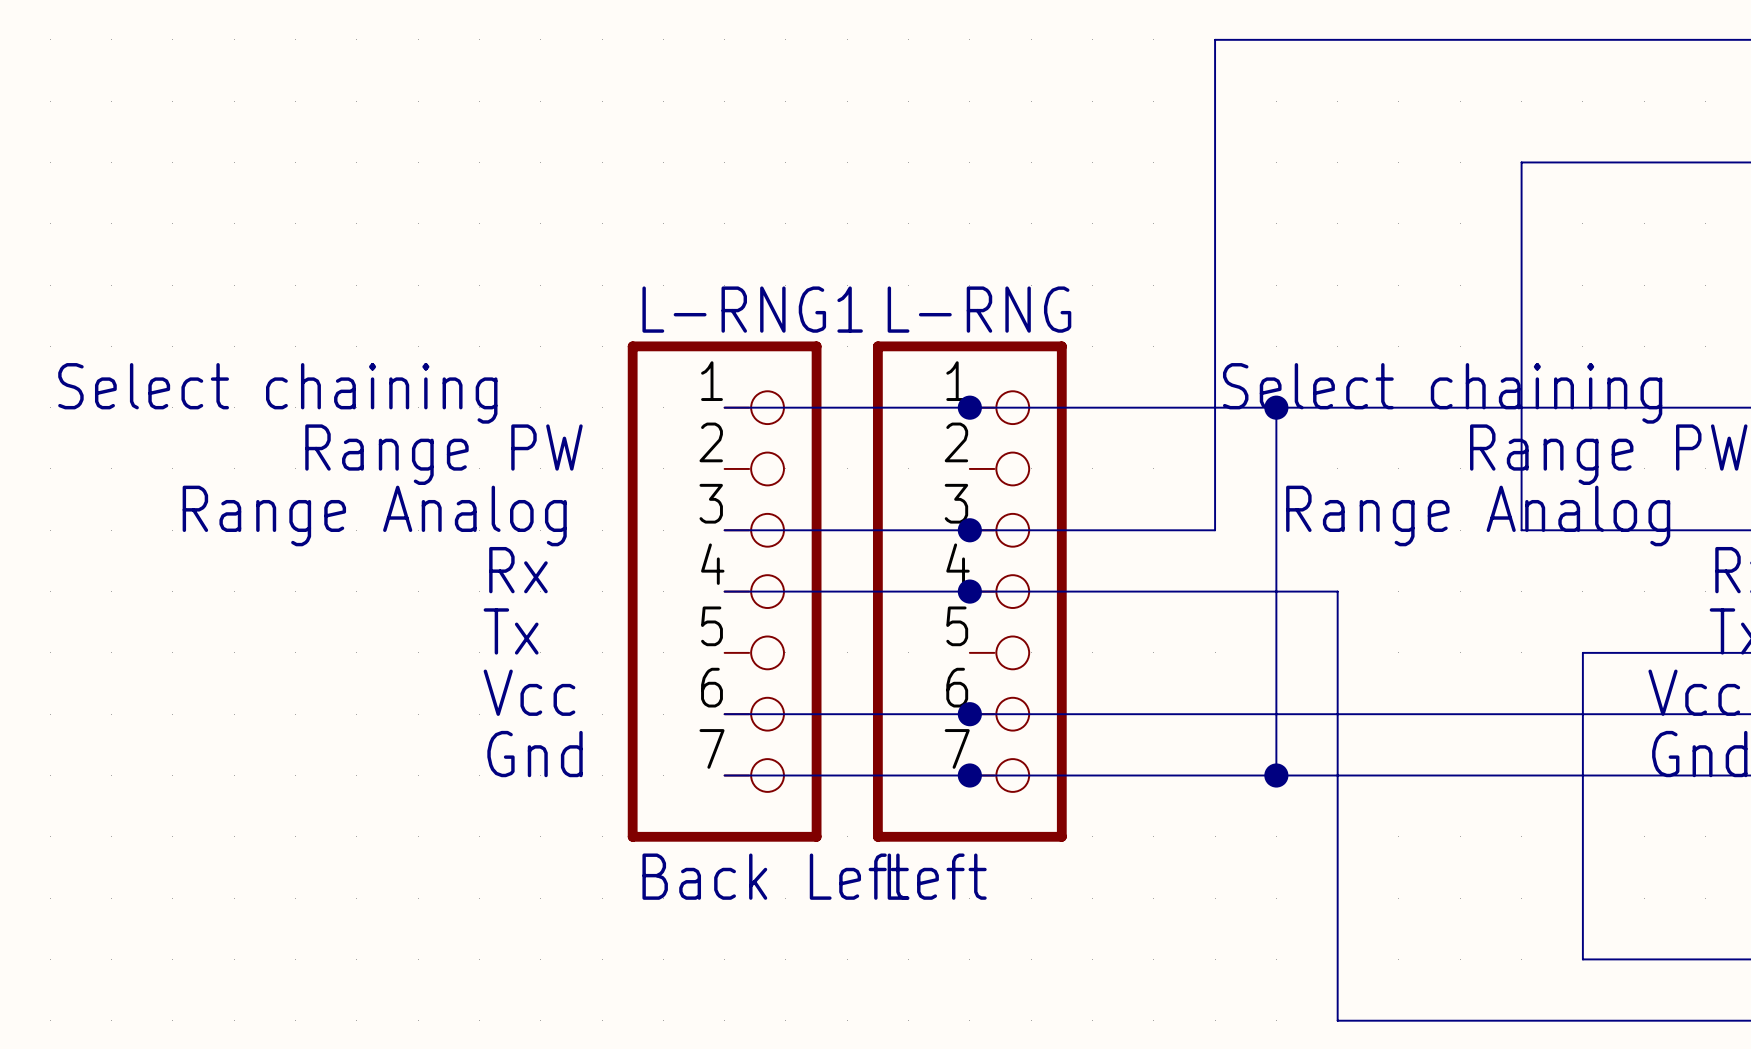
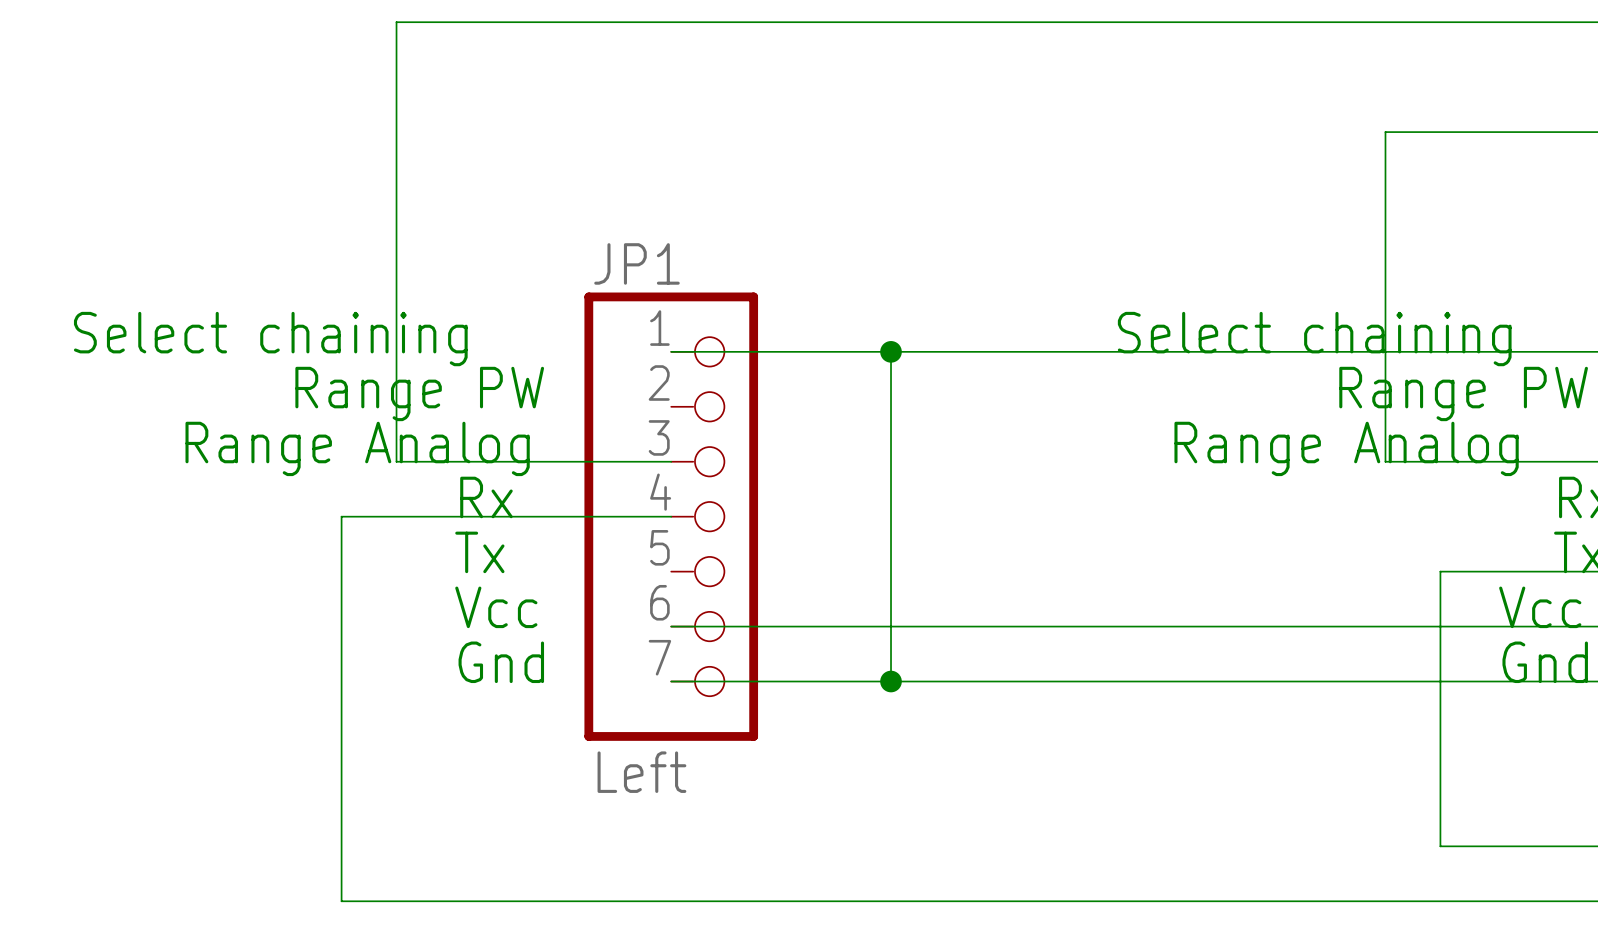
wire: (1215, 39) (1215, 530) (724, 530) -> (1110, 22) (396, 22) (396, 461) (671, 461)
L-RNG1 name: L-RNG1 (752, 309) -> JP1 (637, 263)
wire: (1276, 407) (1276, 775) -> (891, 351) (891, 681)
junction: (1276, 407) -> none
junction: (969, 530) -> none
wire: (724, 591) (1337, 591) (1337, 1020) -> (671, 516) (341, 516) (341, 901) (1220, 901)
L-RNG: Left (969, 591) -> none
junction: (969, 591) -> none
junction: (969, 714) -> none
junction: (1276, 775) -> none
L-RNG1 value: Back Left (775, 876) -> Left (641, 772)

